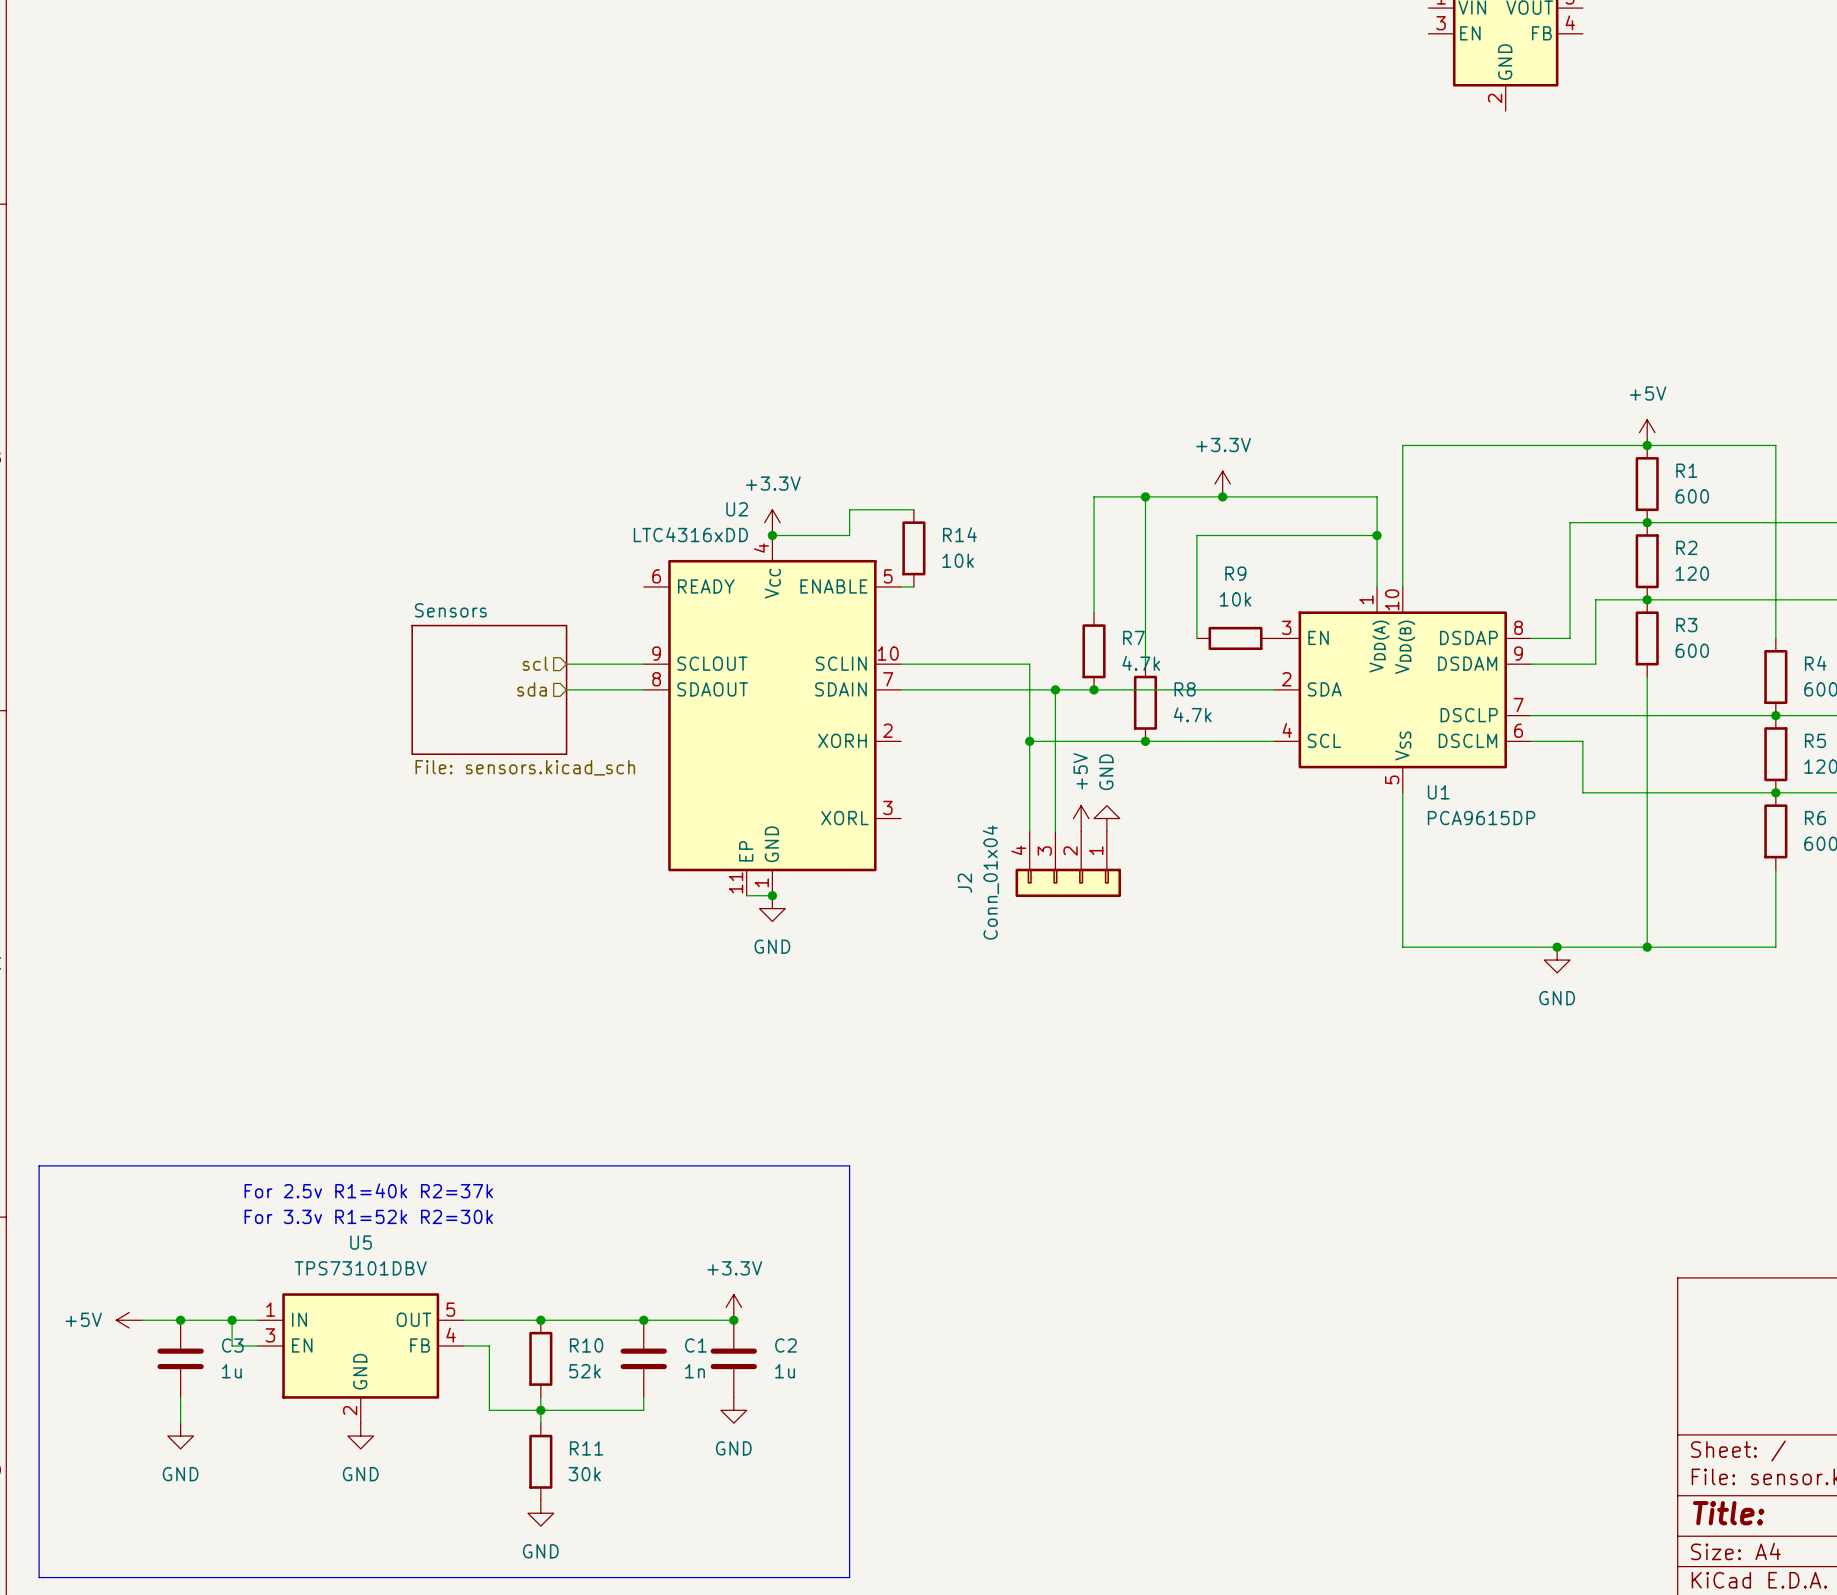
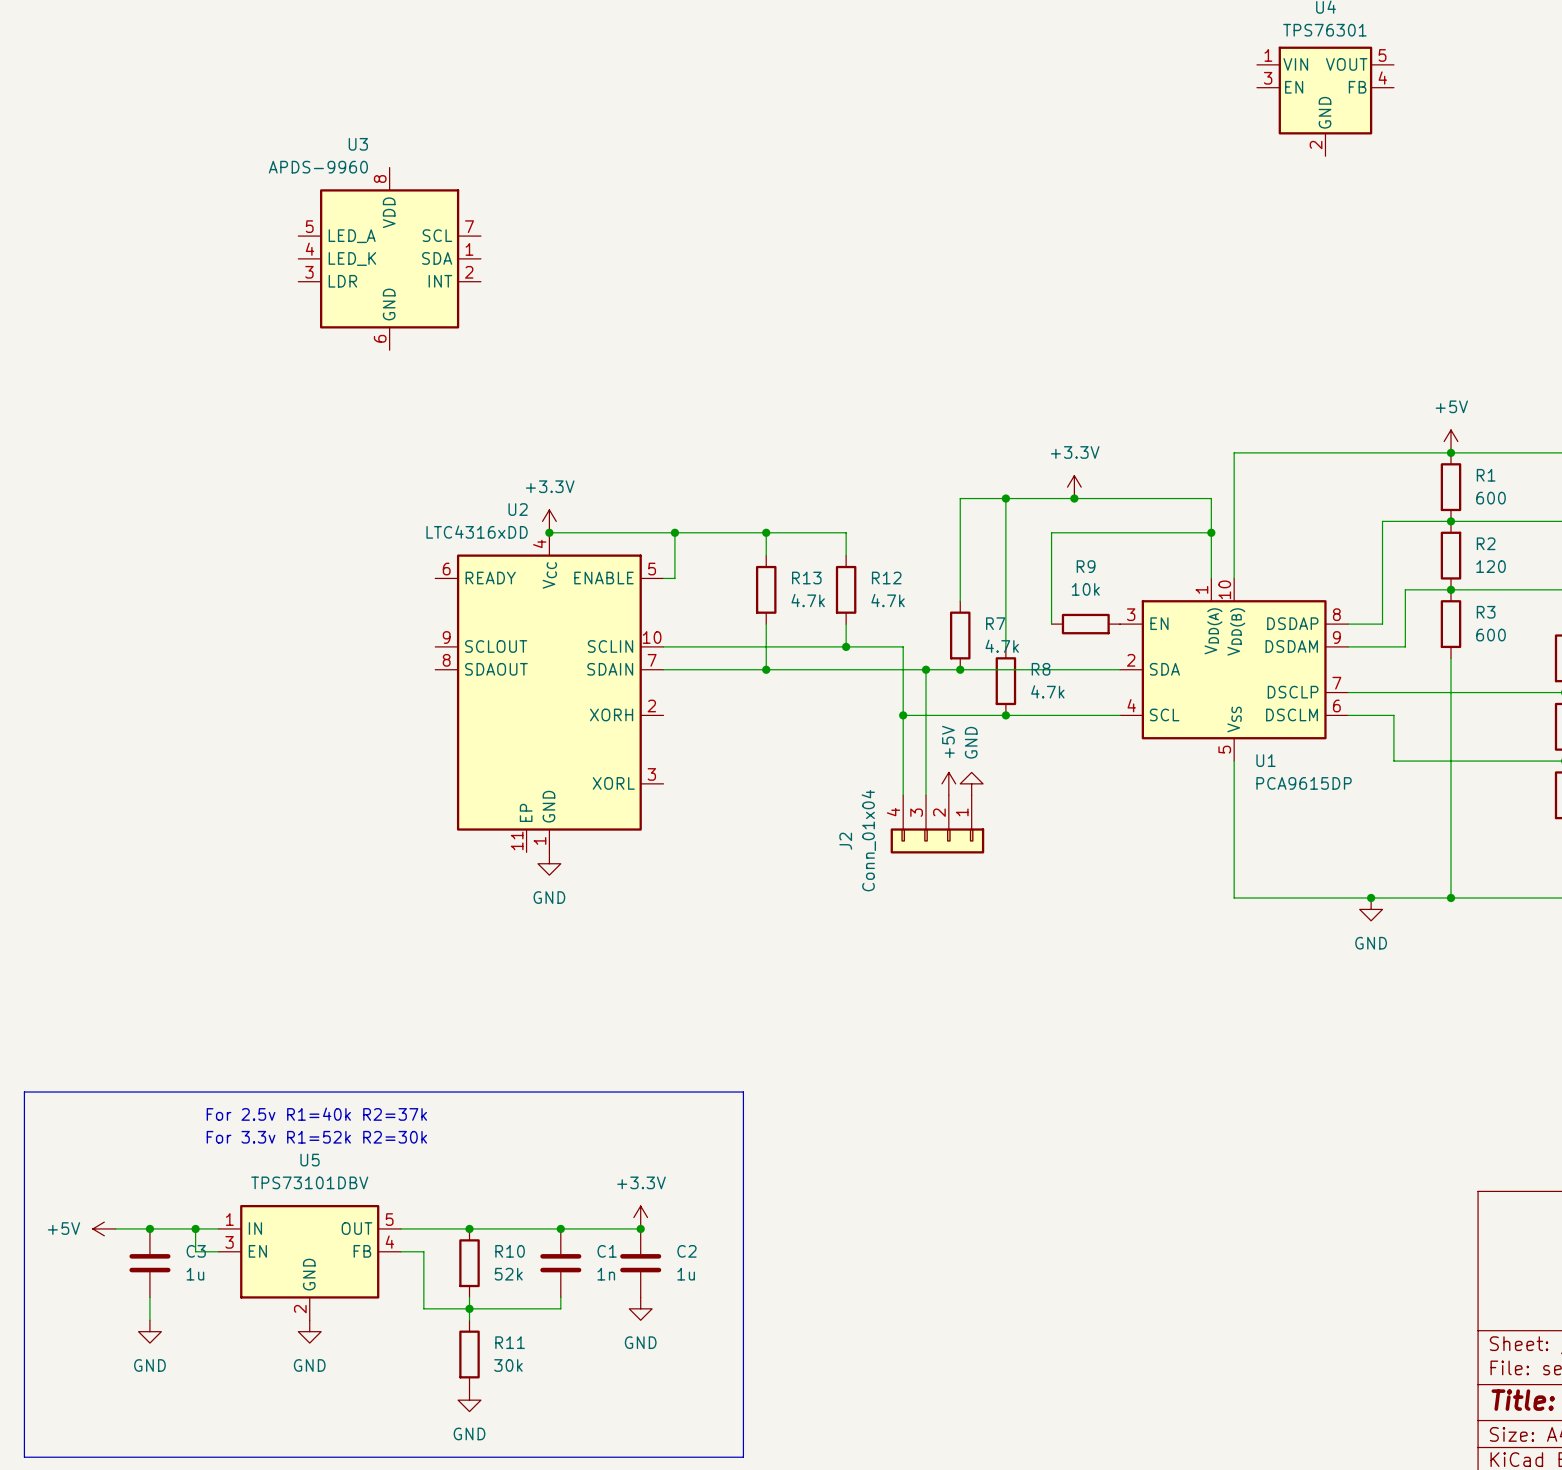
U3: none -> APDS-9960 (389, 258)
wire: (913, 509) (849, 509) (849, 535) -> (846, 555) (846, 532) (743, 532)
power symbol position: +3.3V (772, 522) -> +3.3V (549, 521)
wire: none -> (549, 532) (674, 532) (674, 578) (663, 578)
junction: none -> (549, 532)
wire: none -> (766, 532) (766, 555)
junction: none -> (766, 532)
R14: 10k (913, 548) -> none
R13: none -> 4.7k (766, 589)
R12: none -> 4.7k (846, 589)
wire: none -> (846, 624) (846, 646)
hierarchical label: scl (535, 663) -> none
junction: none -> (846, 646)
sheet Sensors: File: sensors.kicad_sch (489, 689) -> none
hierarchical label: sda (532, 689) -> none
junction: none -> (766, 669)
U2 position: (772, 715) -> (549, 692)
wire: (746, 895) (772, 895) -> none
junction: (772, 895) -> none
power symbol position: GND (772, 908) -> GND (549, 863)

